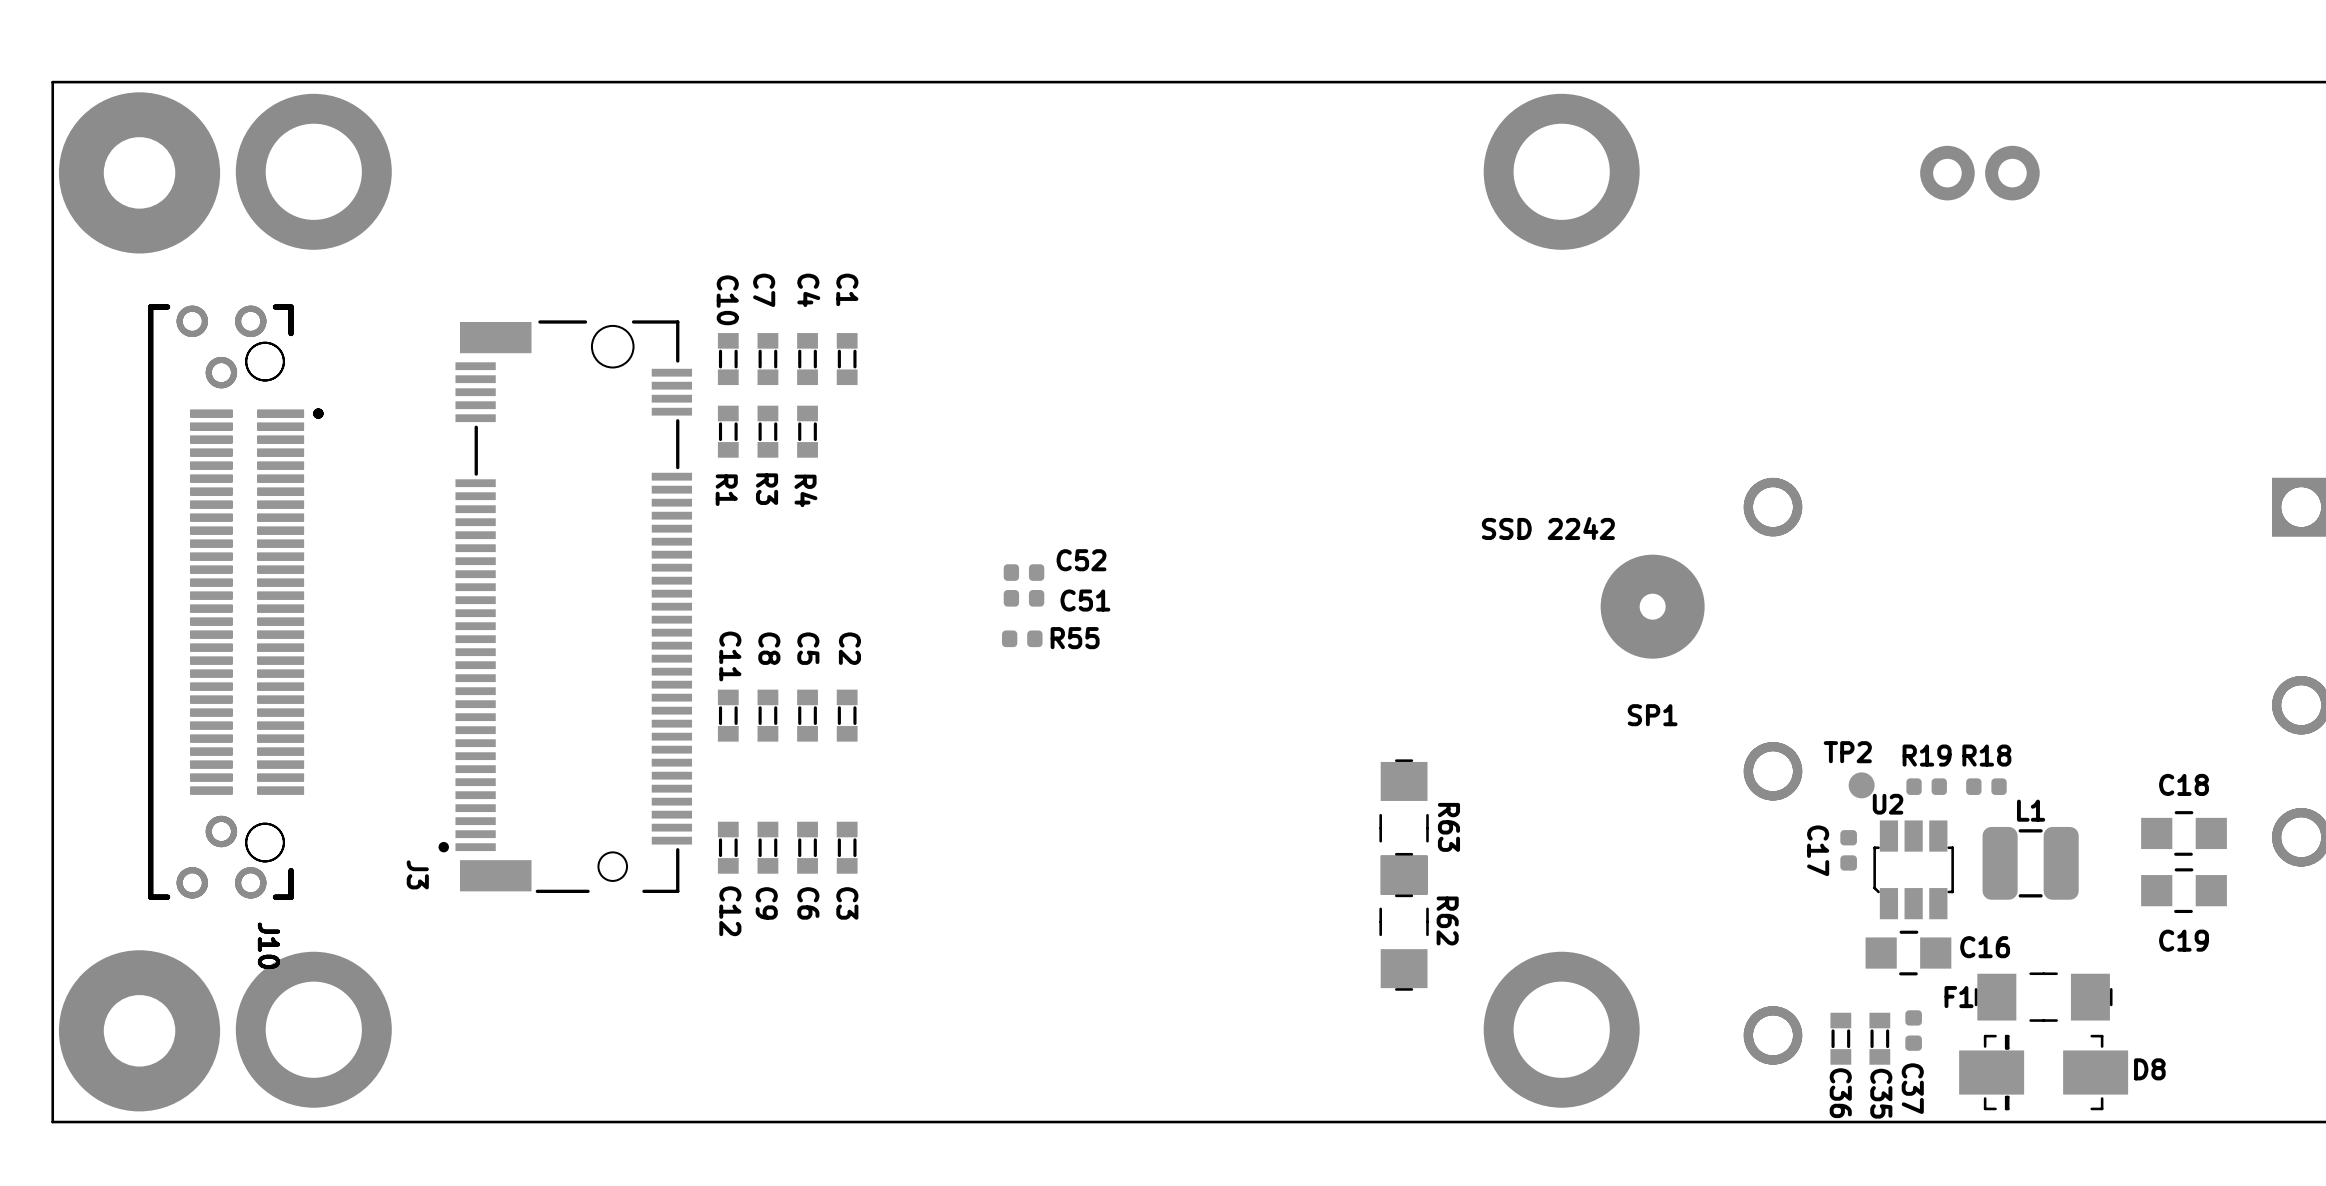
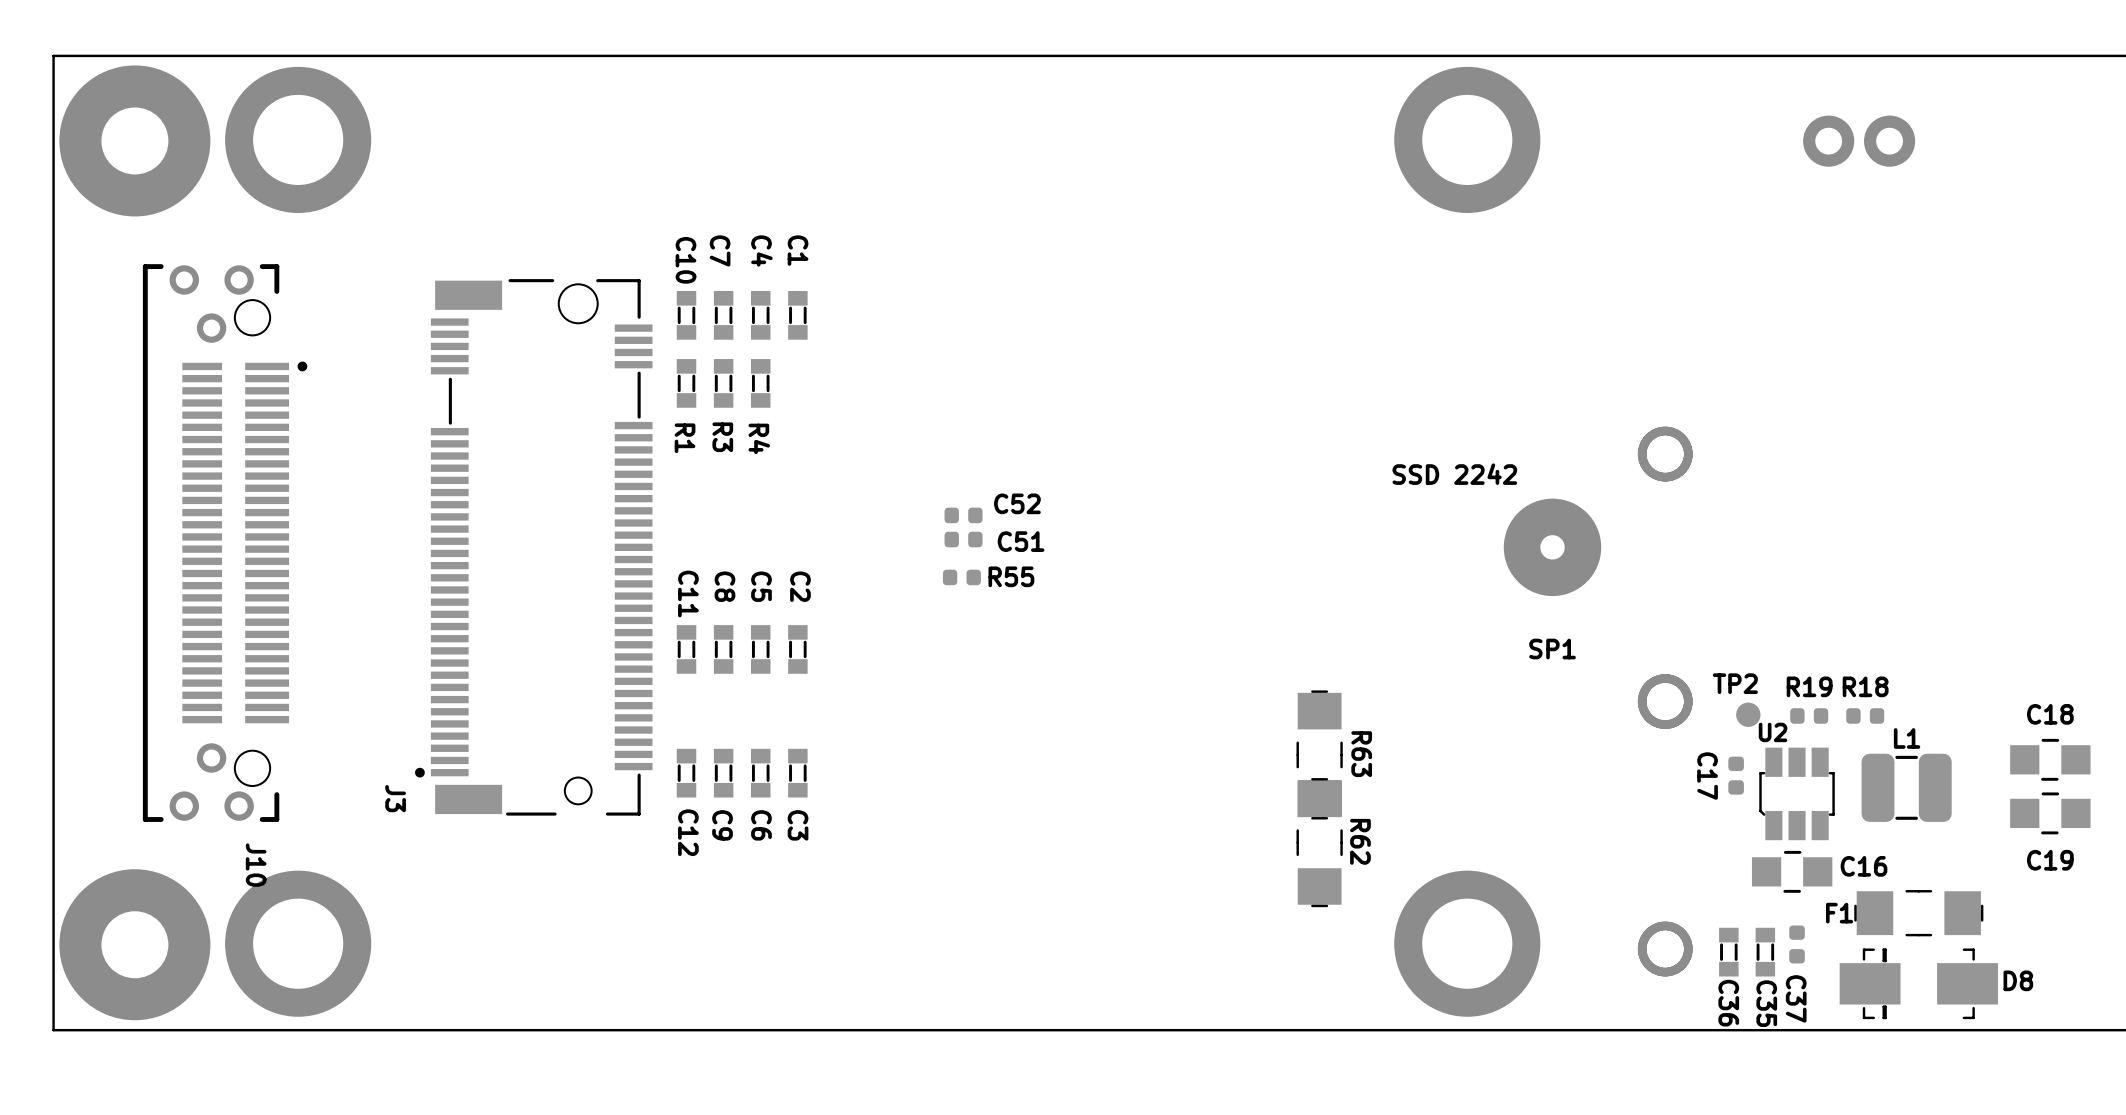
J10: (235, 602) -> none

